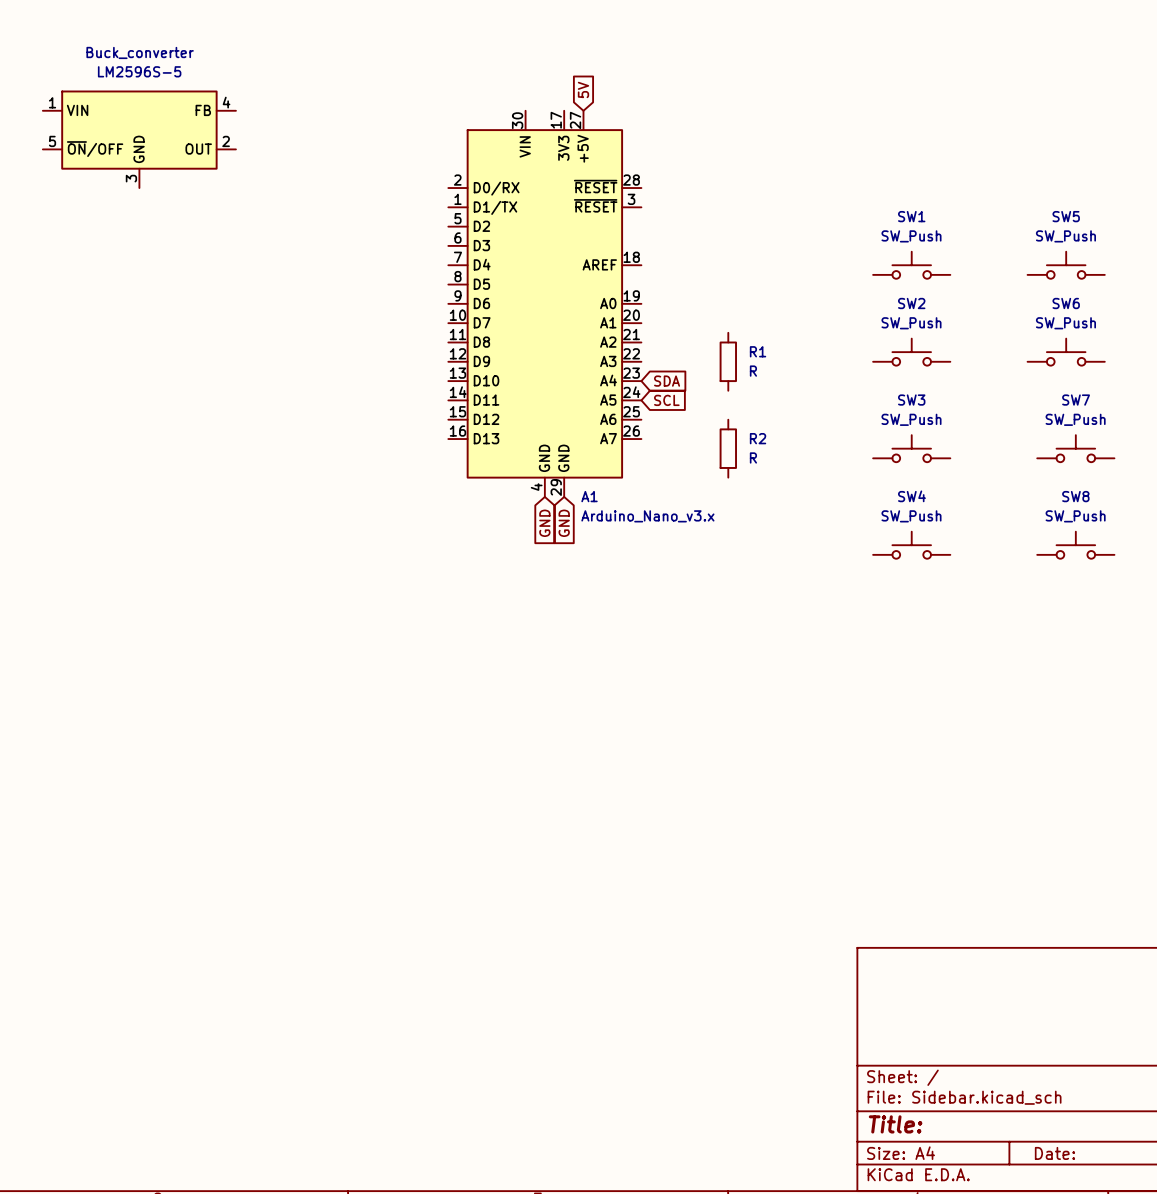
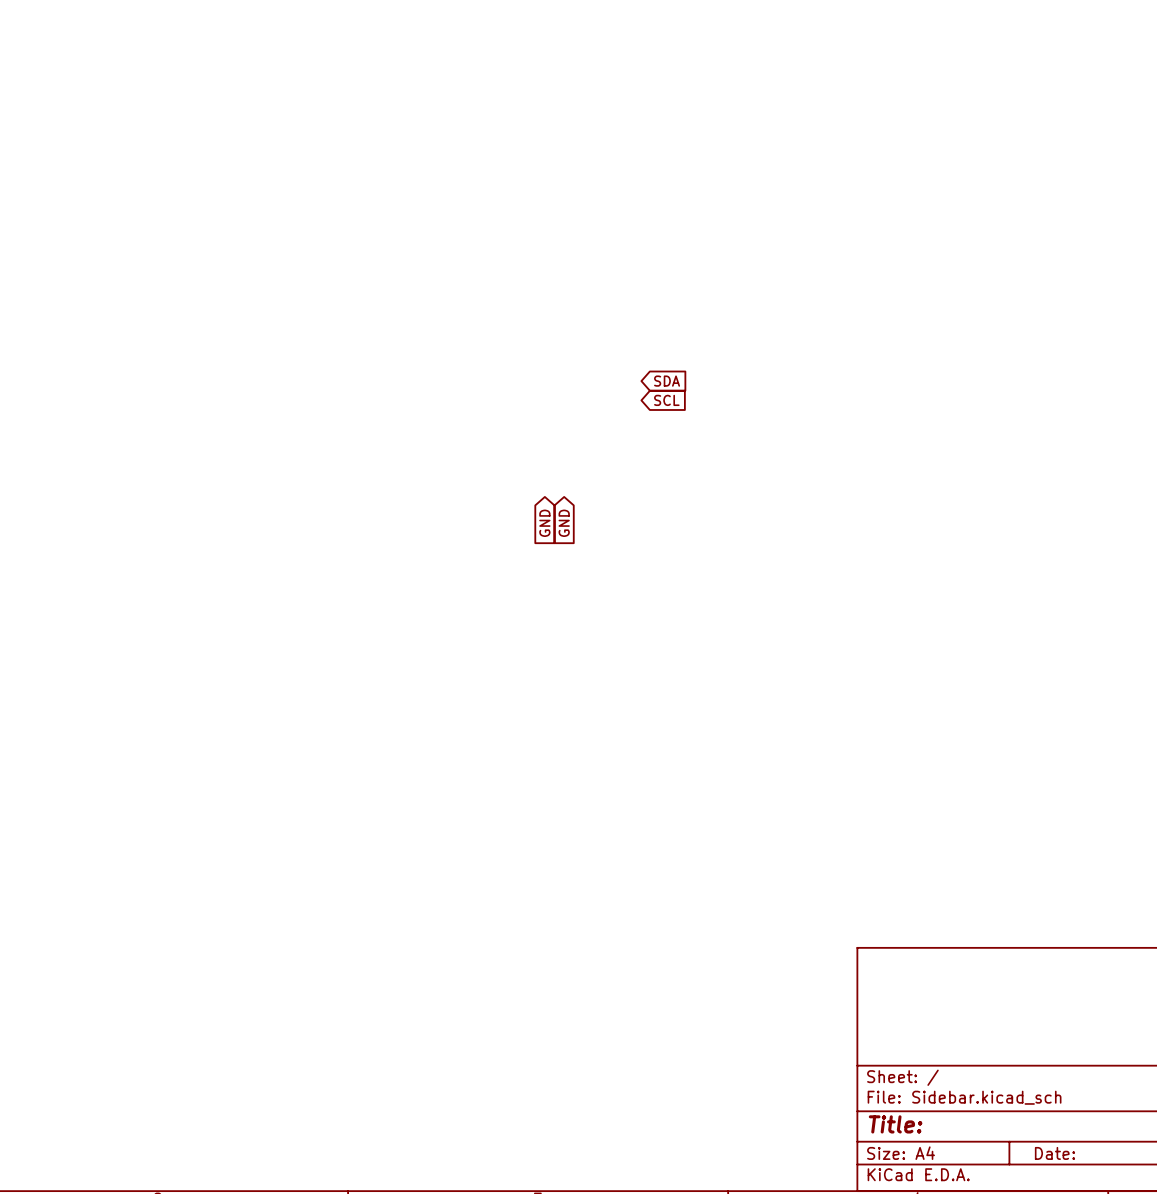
global label: 5V (583, 89) -> none
Buck_converter: LM2596S-5 (139, 139) -> none
SW1: SW_Push (911, 265) -> none
SW5: SW_Push (1066, 265) -> none
A1: Arduino_Nano_v3.x (544, 303) -> none
SW2: SW_Push (911, 352) -> none
SW6: SW_Push (1066, 352) -> none
R1: R (728, 361) -> none
R2: R (728, 448) -> none
SW3: SW_Push (911, 448) -> none
SW7: SW_Push (1075, 448) -> none
SW4: SW_Push (911, 545) -> none
SW8: SW_Push (1075, 545) -> none

